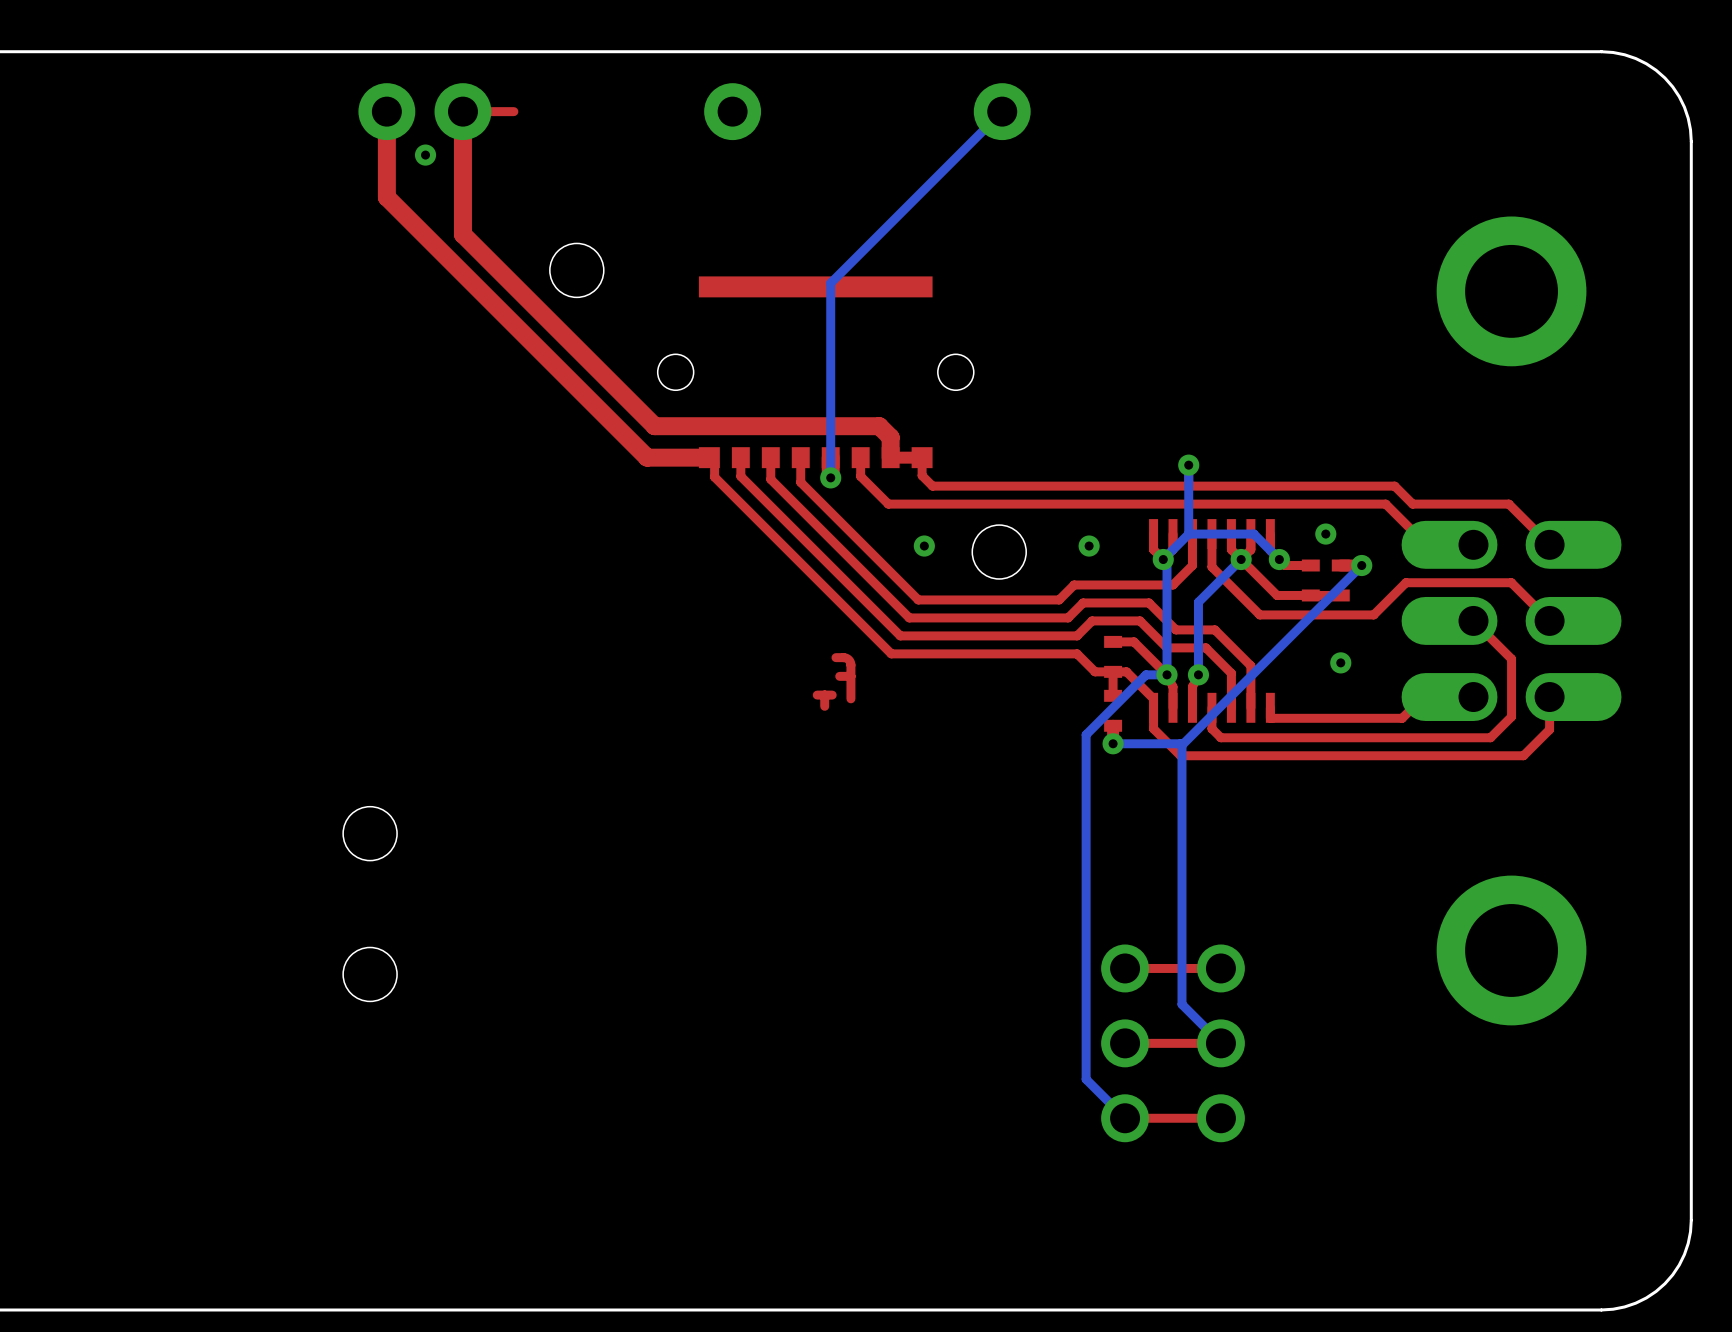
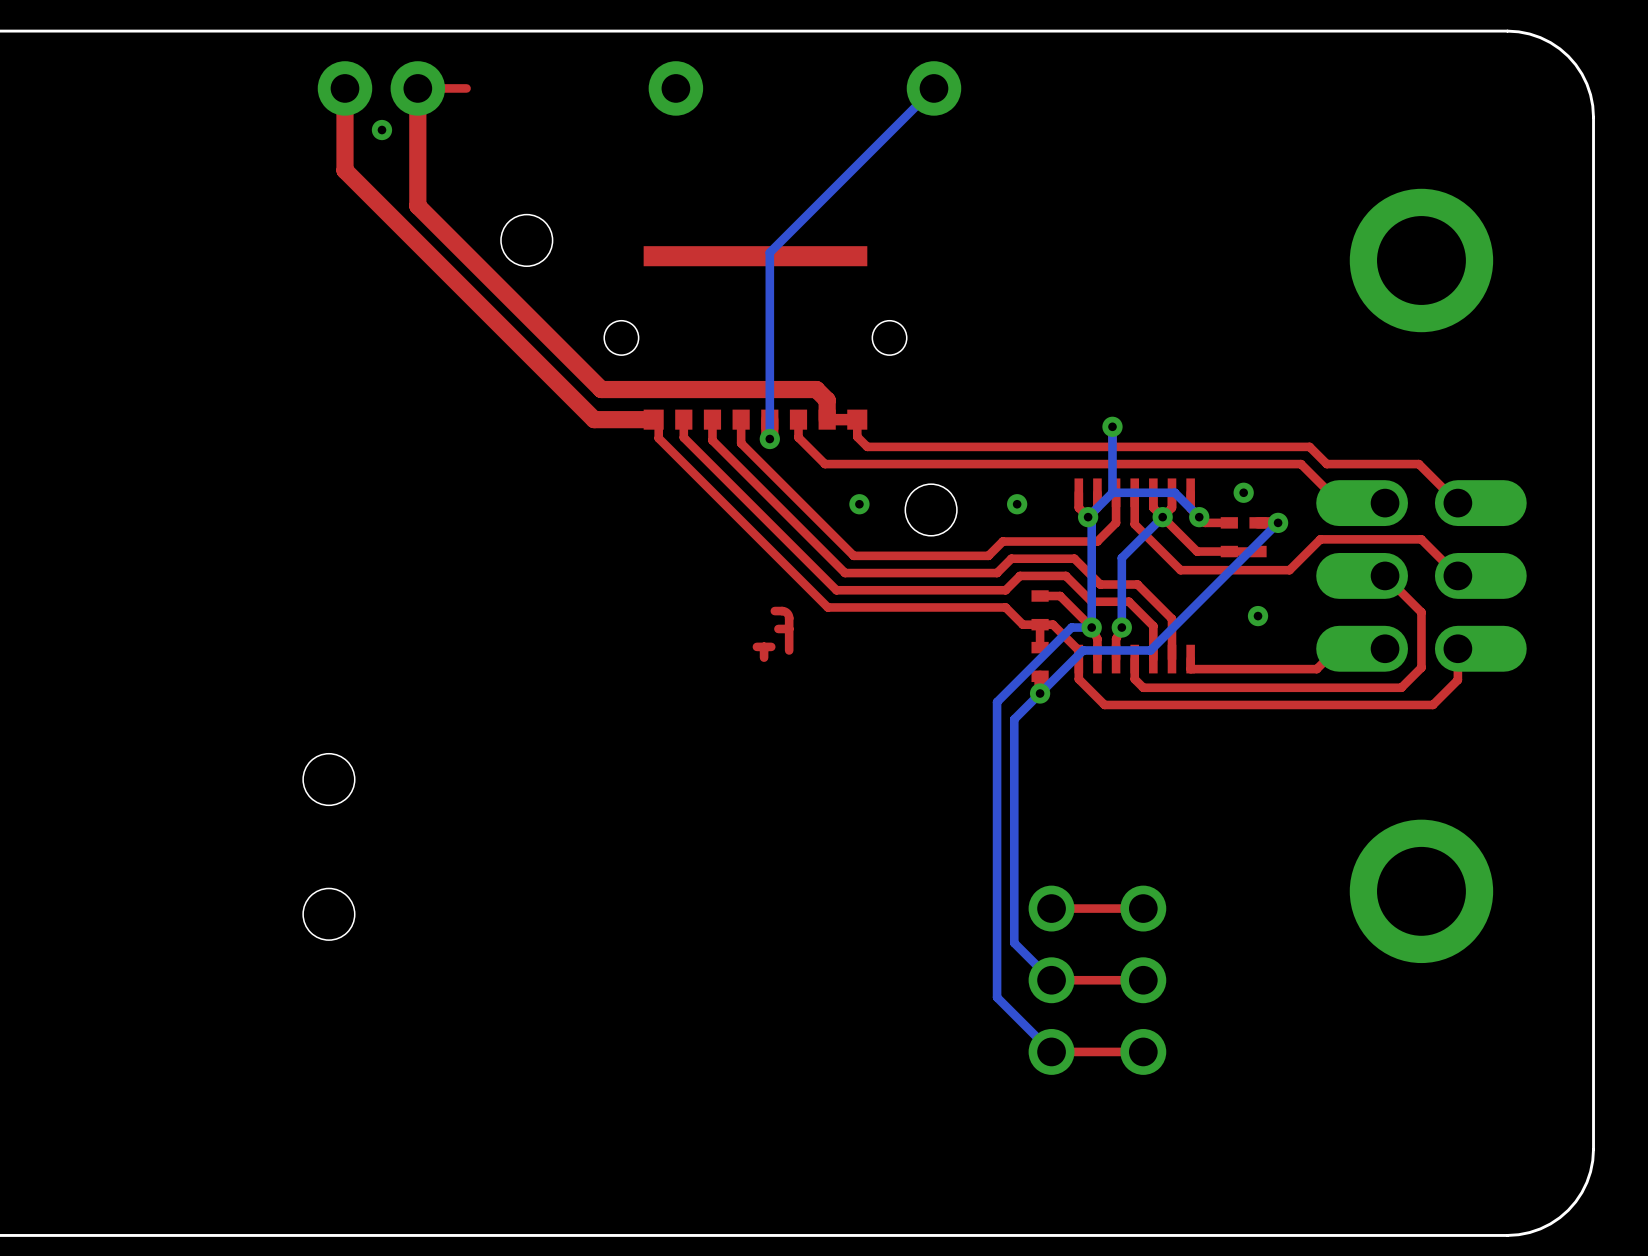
bottom track: (1228, 698) (1181, 745) -> (1150, 650) (1083, 650) (1014, 719)
bottom track: (1086, 734) (1086, 770) -> (1014, 684) (997, 702) (997, 997) (1014, 1014)
bottom track: (1113, 743) (1181, 745) -> none
bottom track: (1181, 745) (1181, 1004) (1220, 1043) -> none
bottom track: (1086, 1004) (1086, 1079) -> (1014, 942) (1051, 980)

